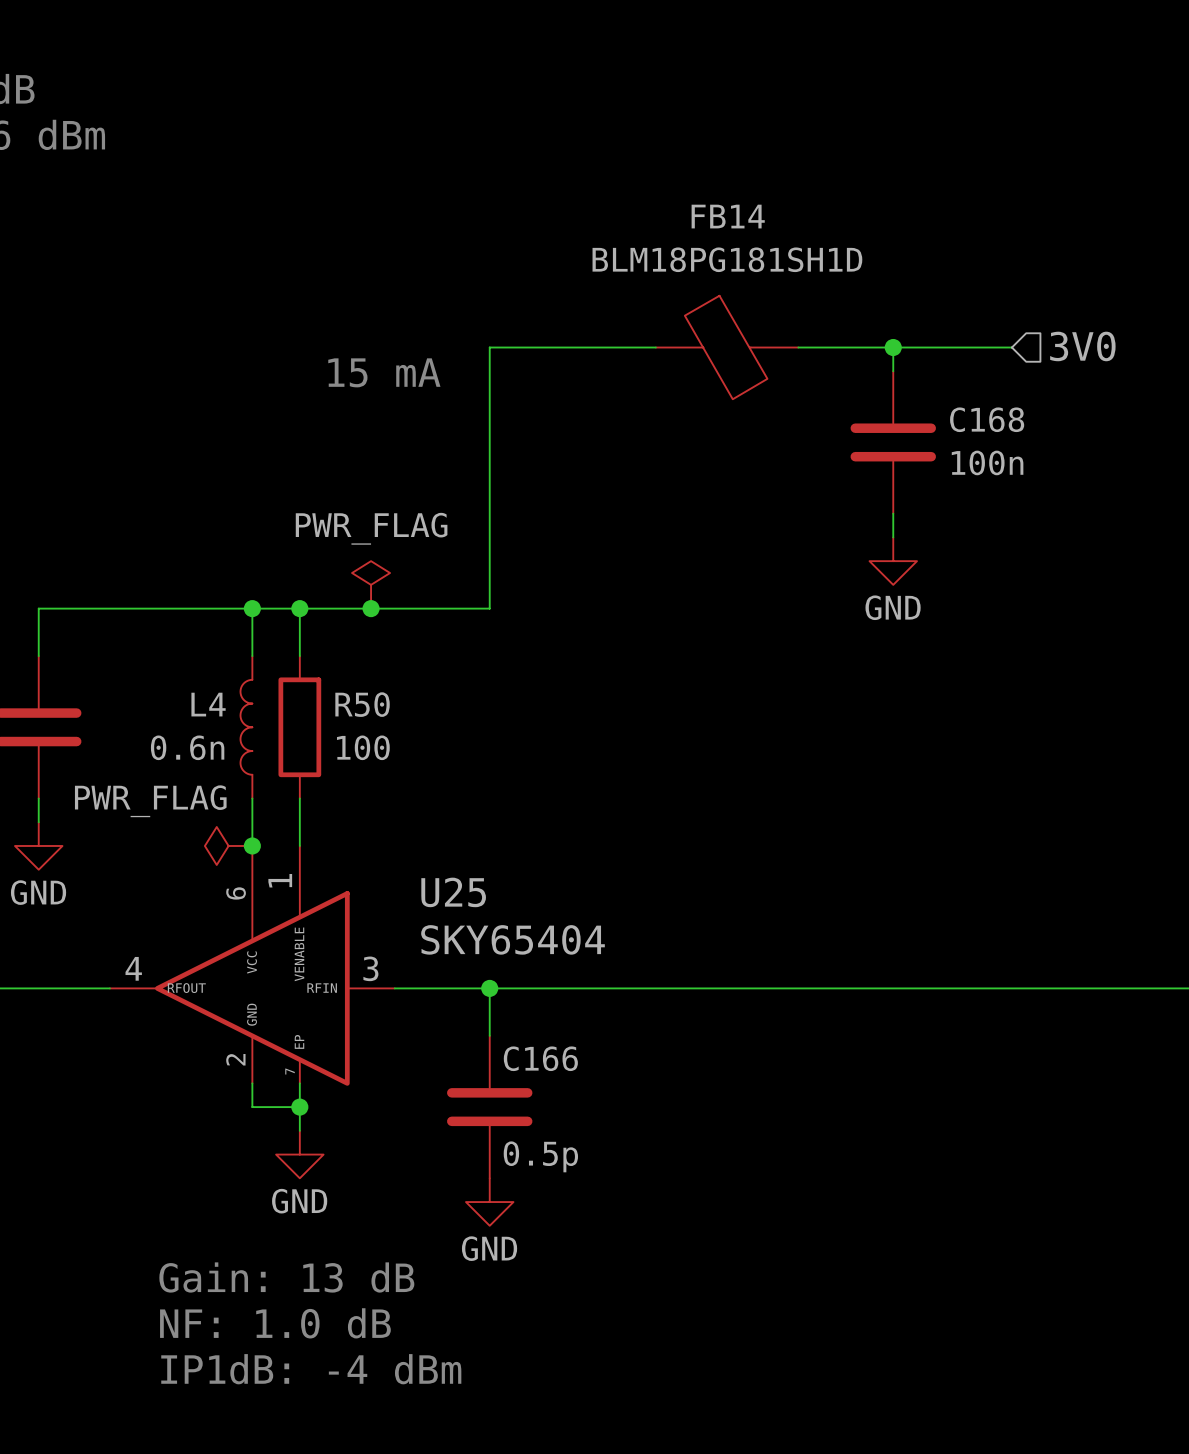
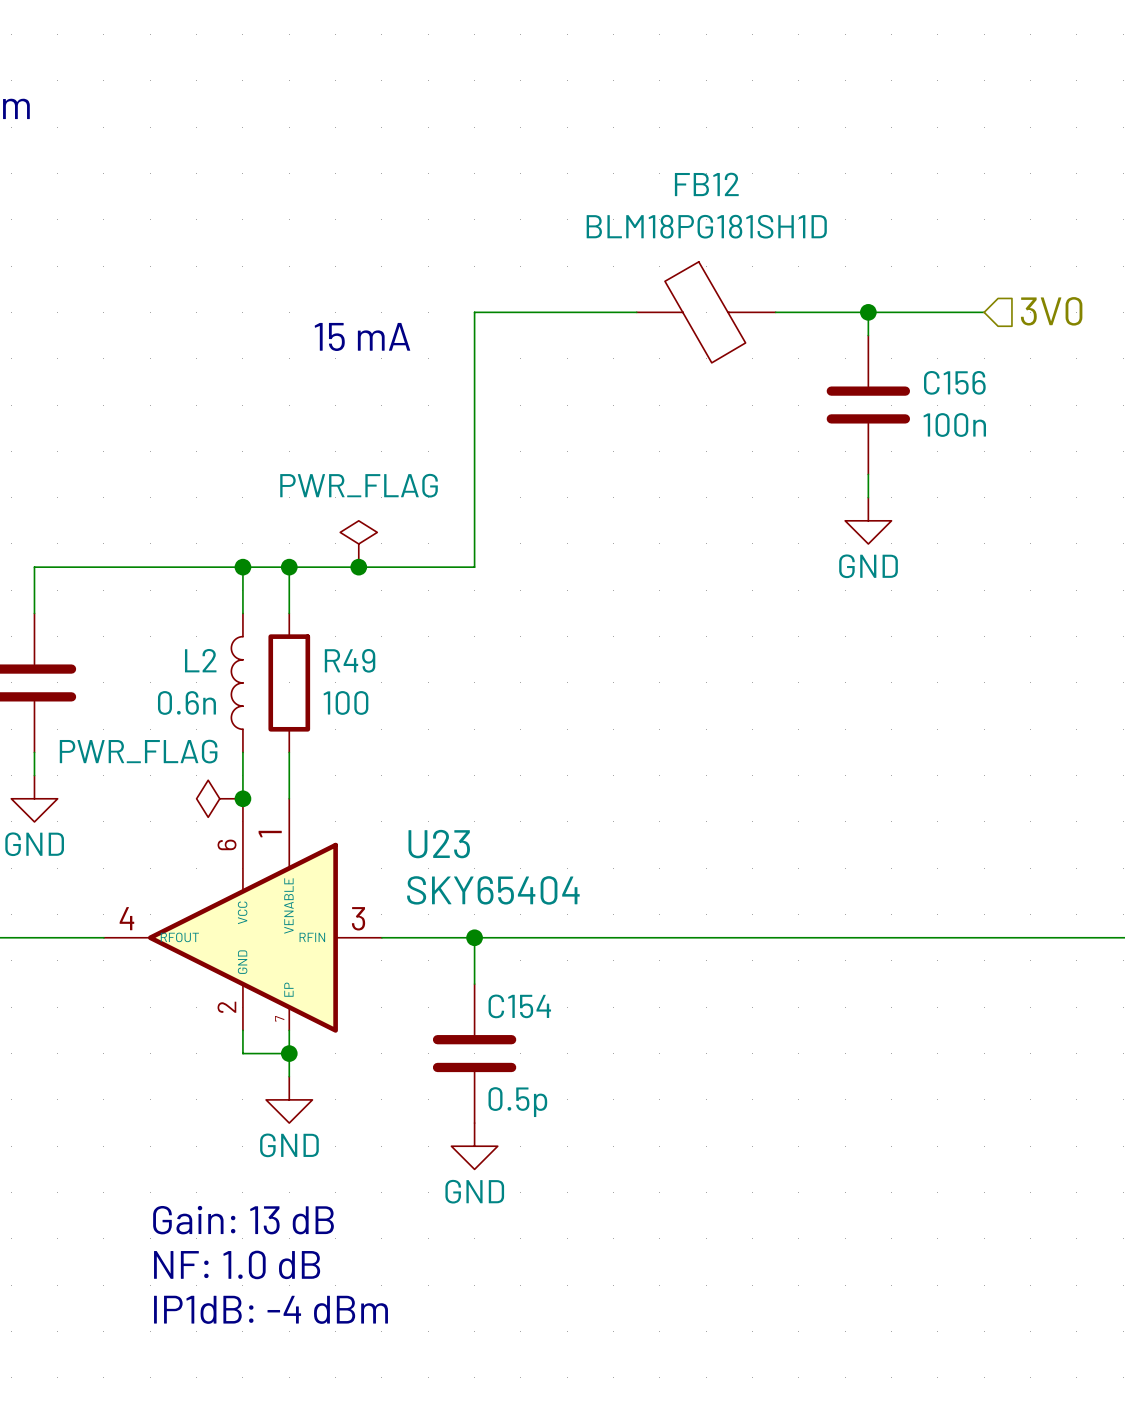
FB14 name: FB14 (728, 216) -> FB12 (706, 184)
C168 name: C168 (987, 419) -> C156 (954, 382)
L4 name: L4 (208, 704) -> L2 (200, 660)
R50 name: R50 (362, 704) -> R49 (350, 660)
U25 name: U25 (453, 892) -> U23 (439, 844)
C166 name: C166 (540, 1058) -> C154 (519, 1006)

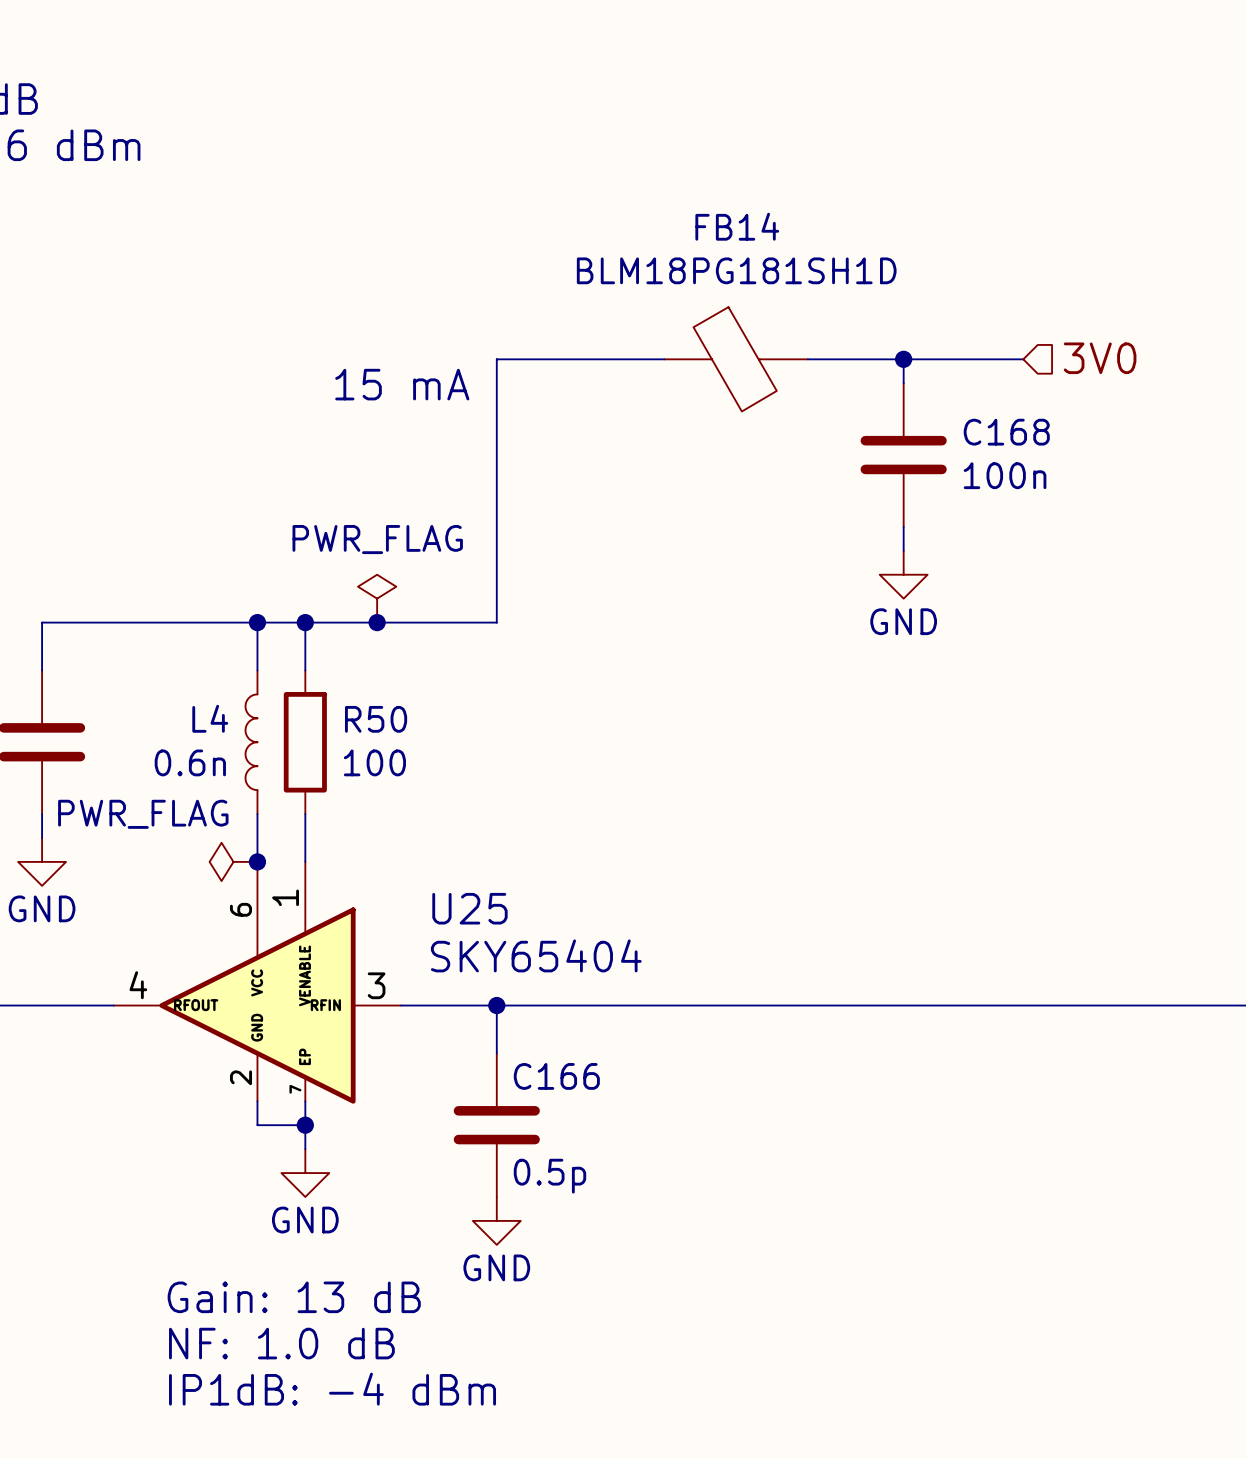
FB12 name: FB12 (706, 184) -> FB14 (737, 226)
C156 name: C156 (954, 382) -> C168 (1006, 432)
L2 name: L2 (200, 660) -> L4 (210, 718)
R49 name: R49 (350, 660) -> R50 (376, 719)
U23 name: U23 (439, 844) -> U25 (469, 908)
C154 name: C154 (519, 1006) -> C166 (556, 1076)

